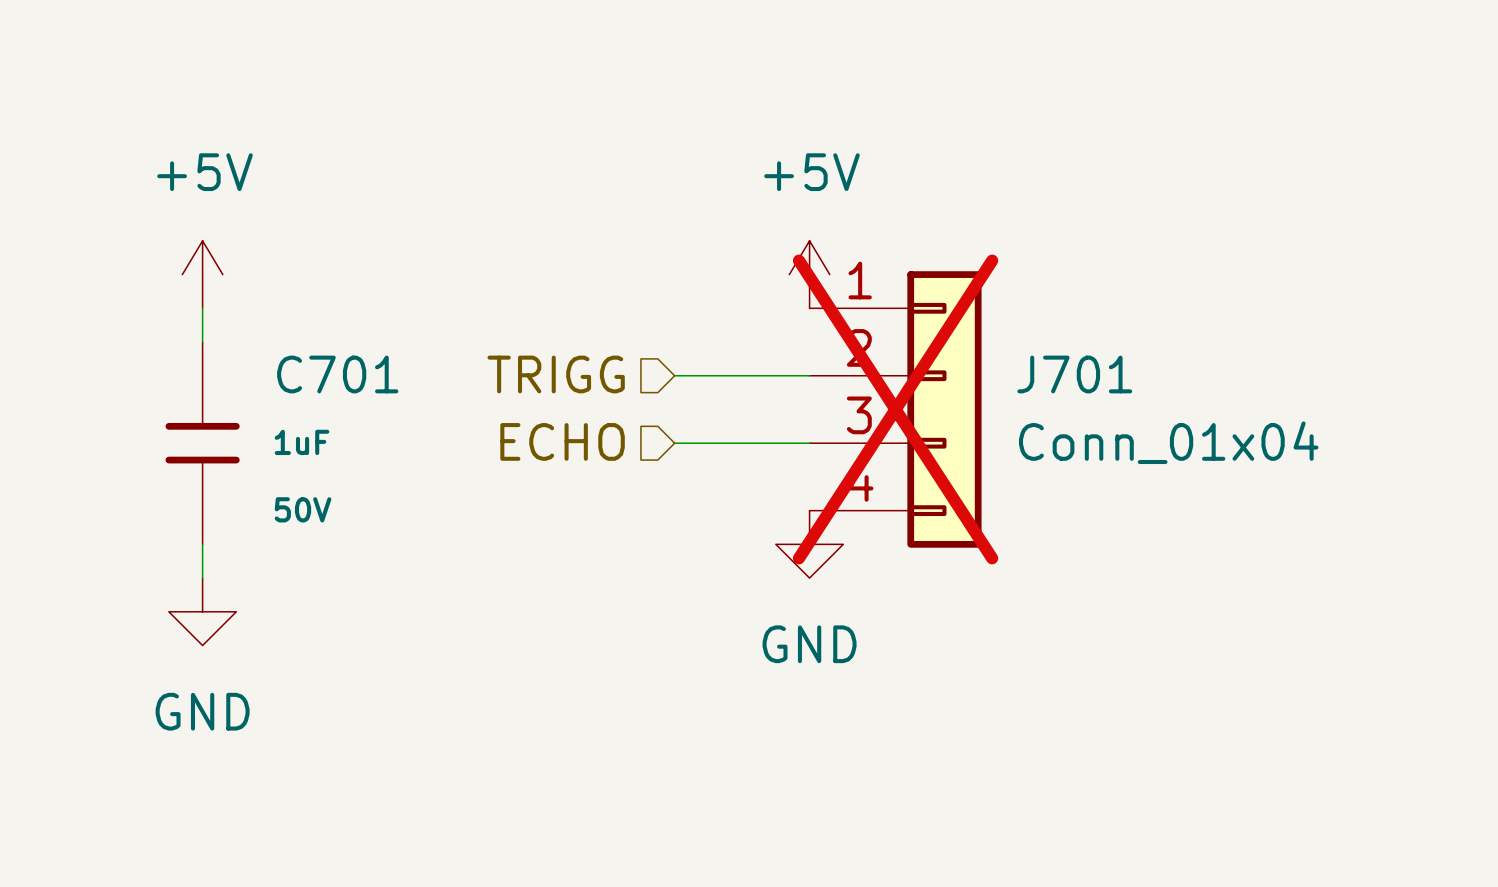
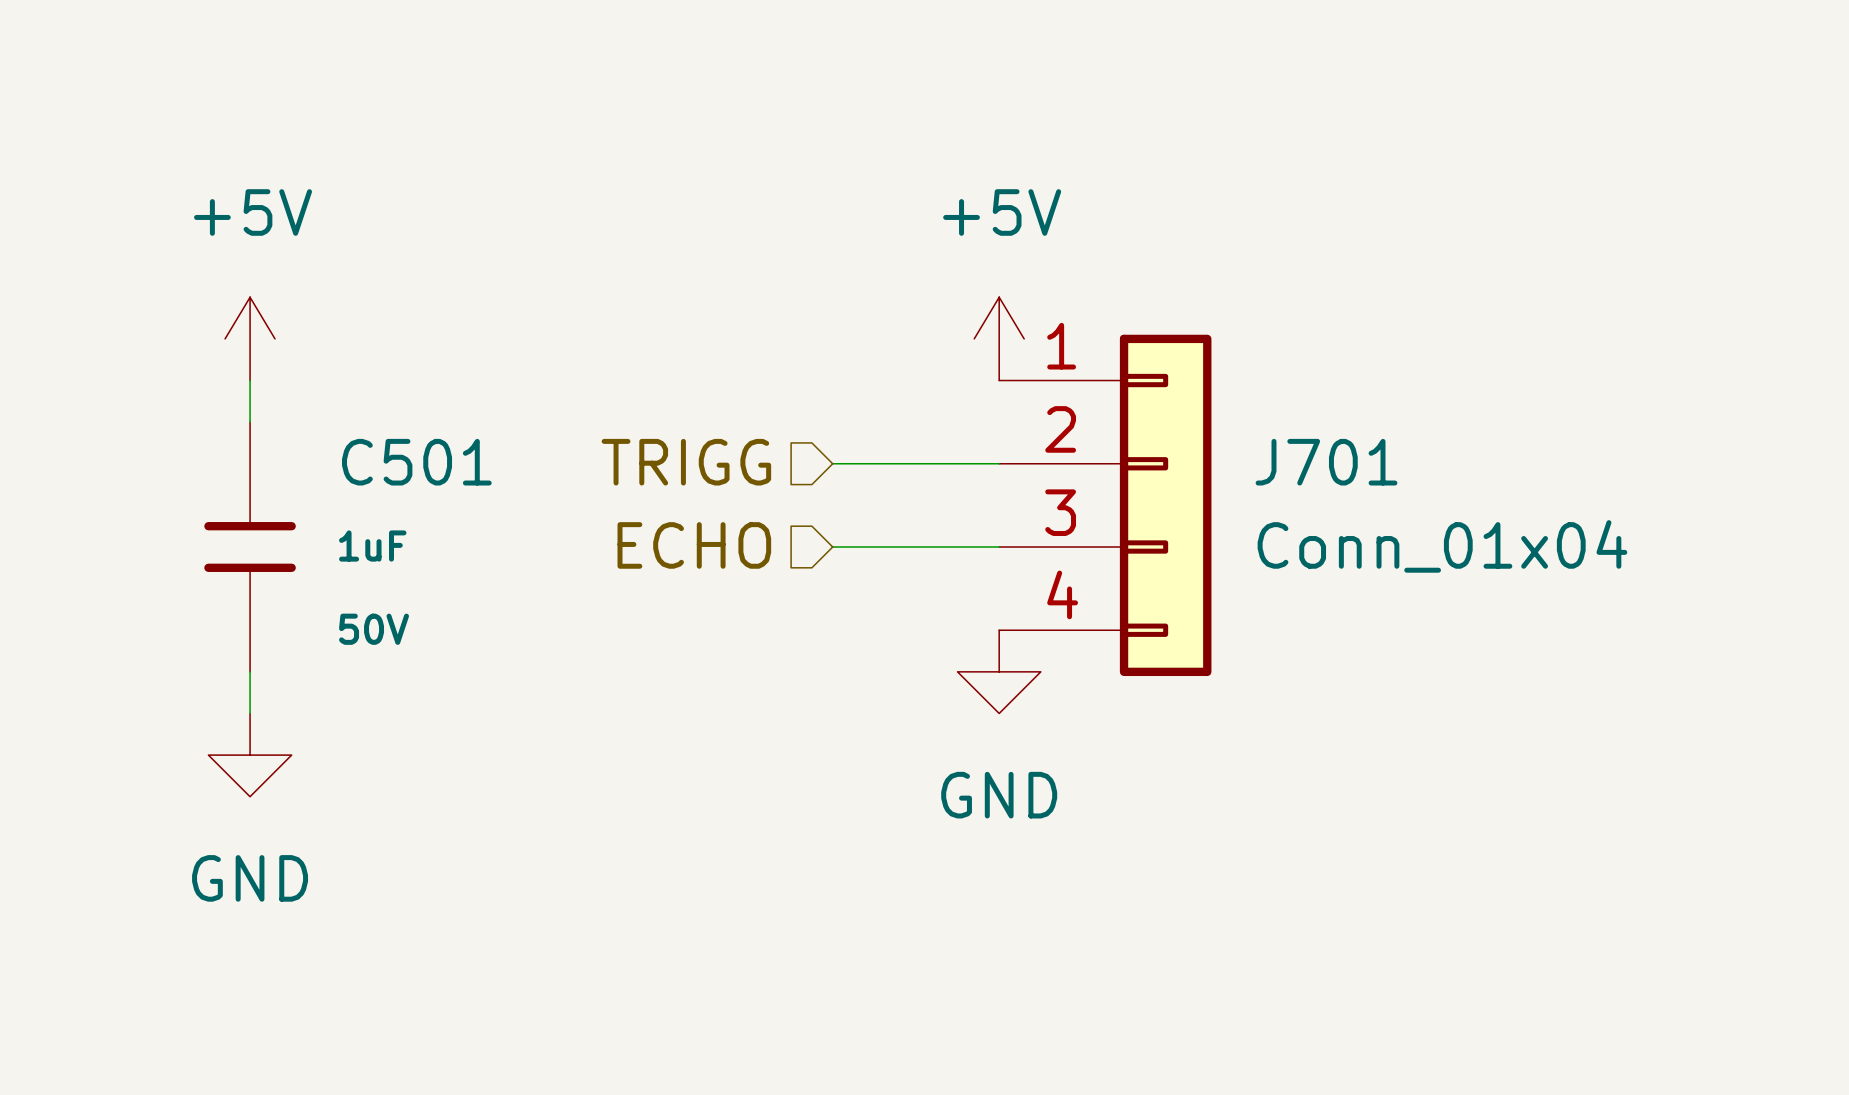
C701 name: C701 (337, 374) -> C501 (416, 462)
J701 do-not-place cross: (895, 409) -> none

